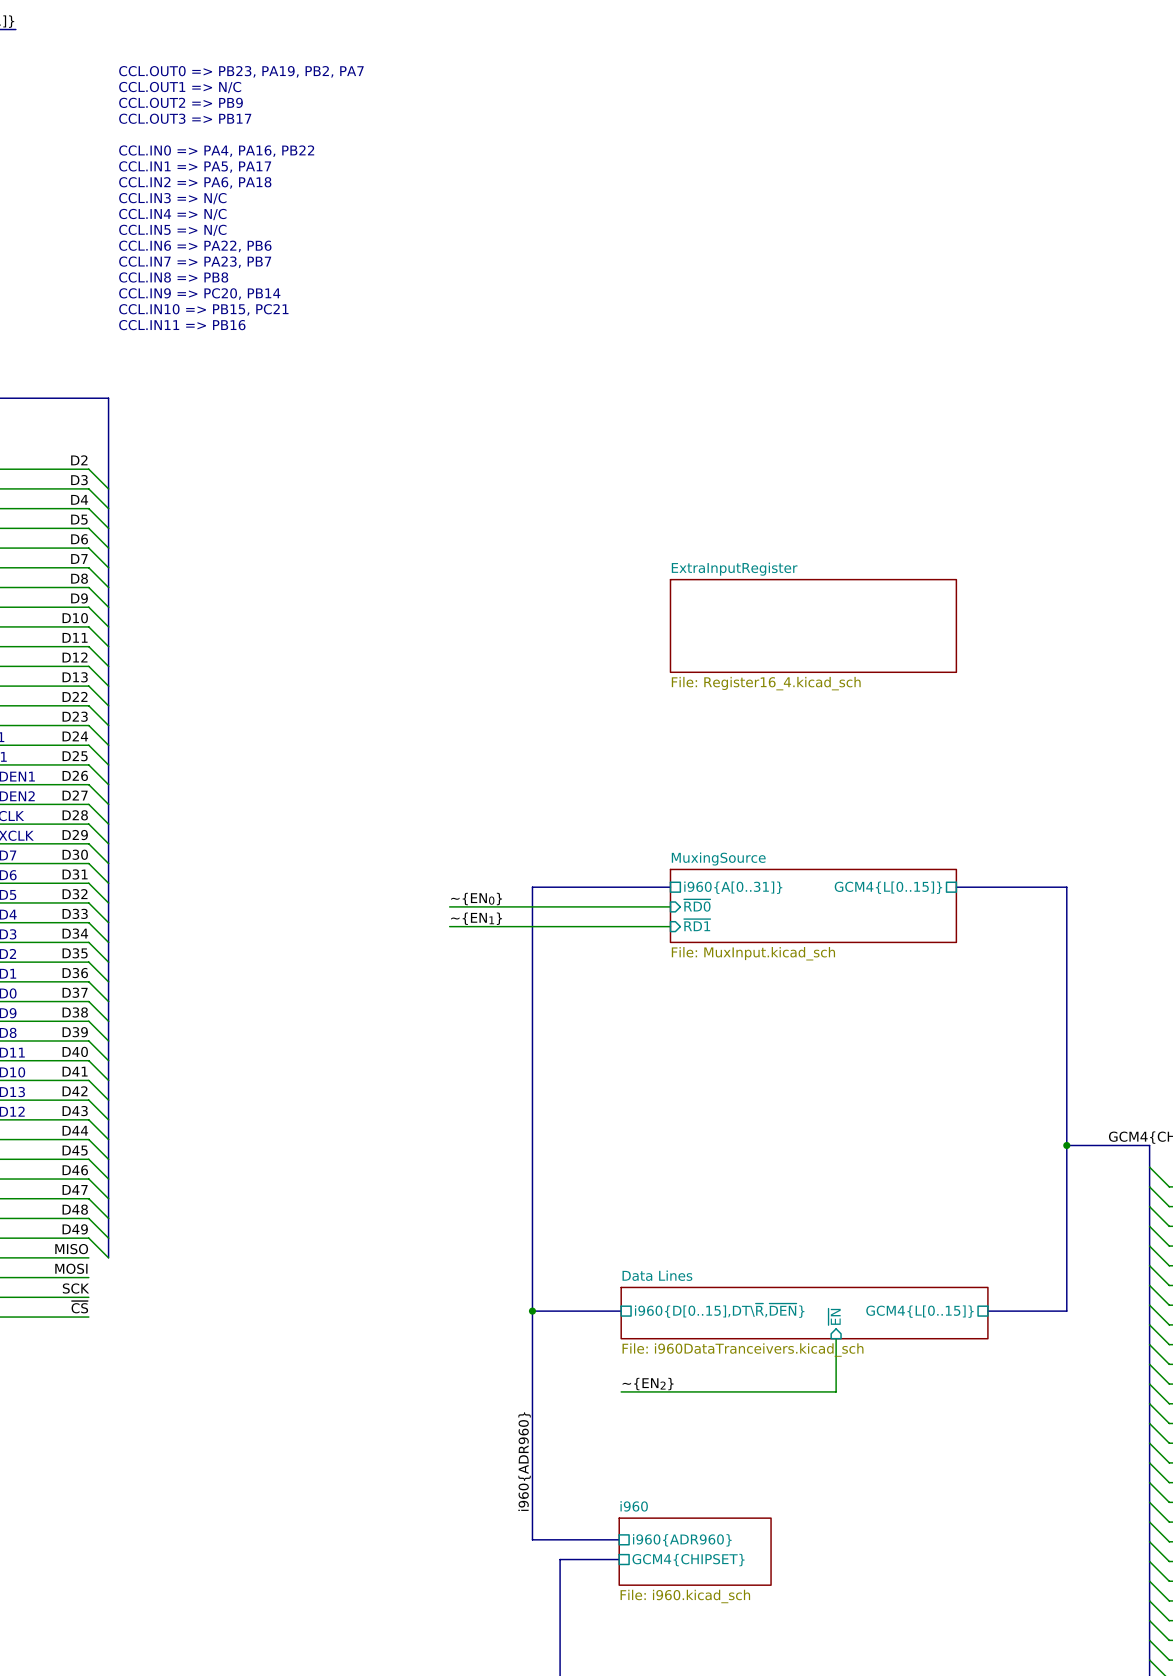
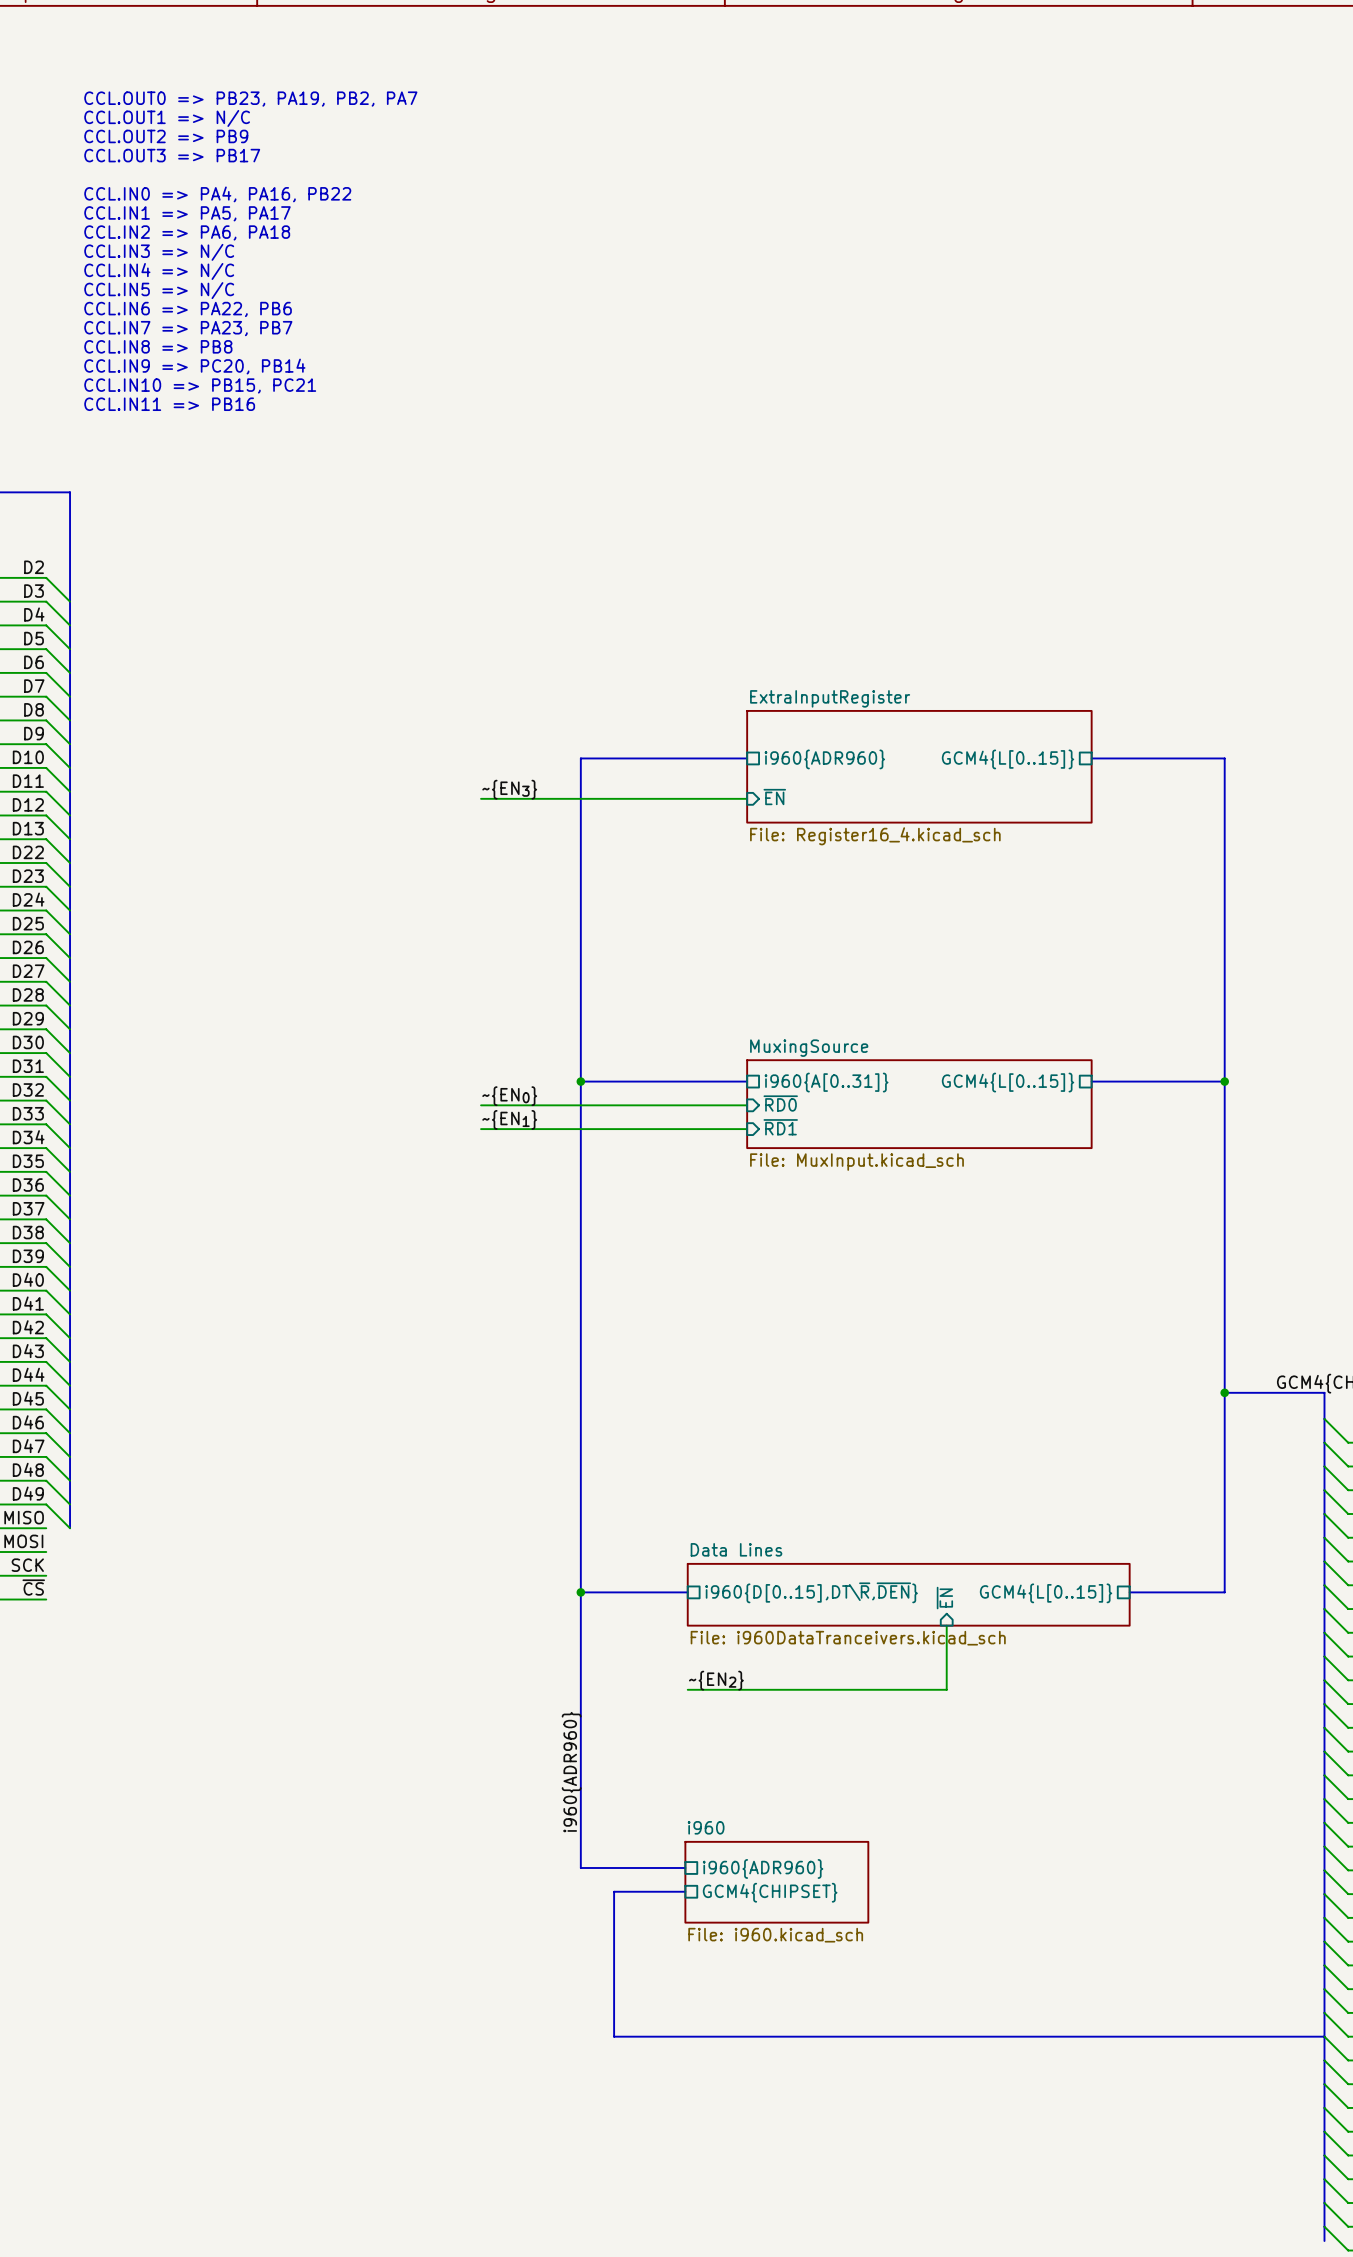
bus: none -> (747, 758) (580, 758) (580, 1081)
sheet pin: none -> i960{ADR960} (824, 759)
sheet pin: none -> GCM4{L[0..15]} (1008, 759)
bus: none -> (1091, 758) (1224, 758) (1224, 1081)
label: none -> ~{EN3} (509, 789)
sheet pin: none -> ~{EN} (774, 797)
wire: none -> (481, 798) (747, 798)
junction: none -> (580, 1081)
junction: none -> (1224, 1081)

